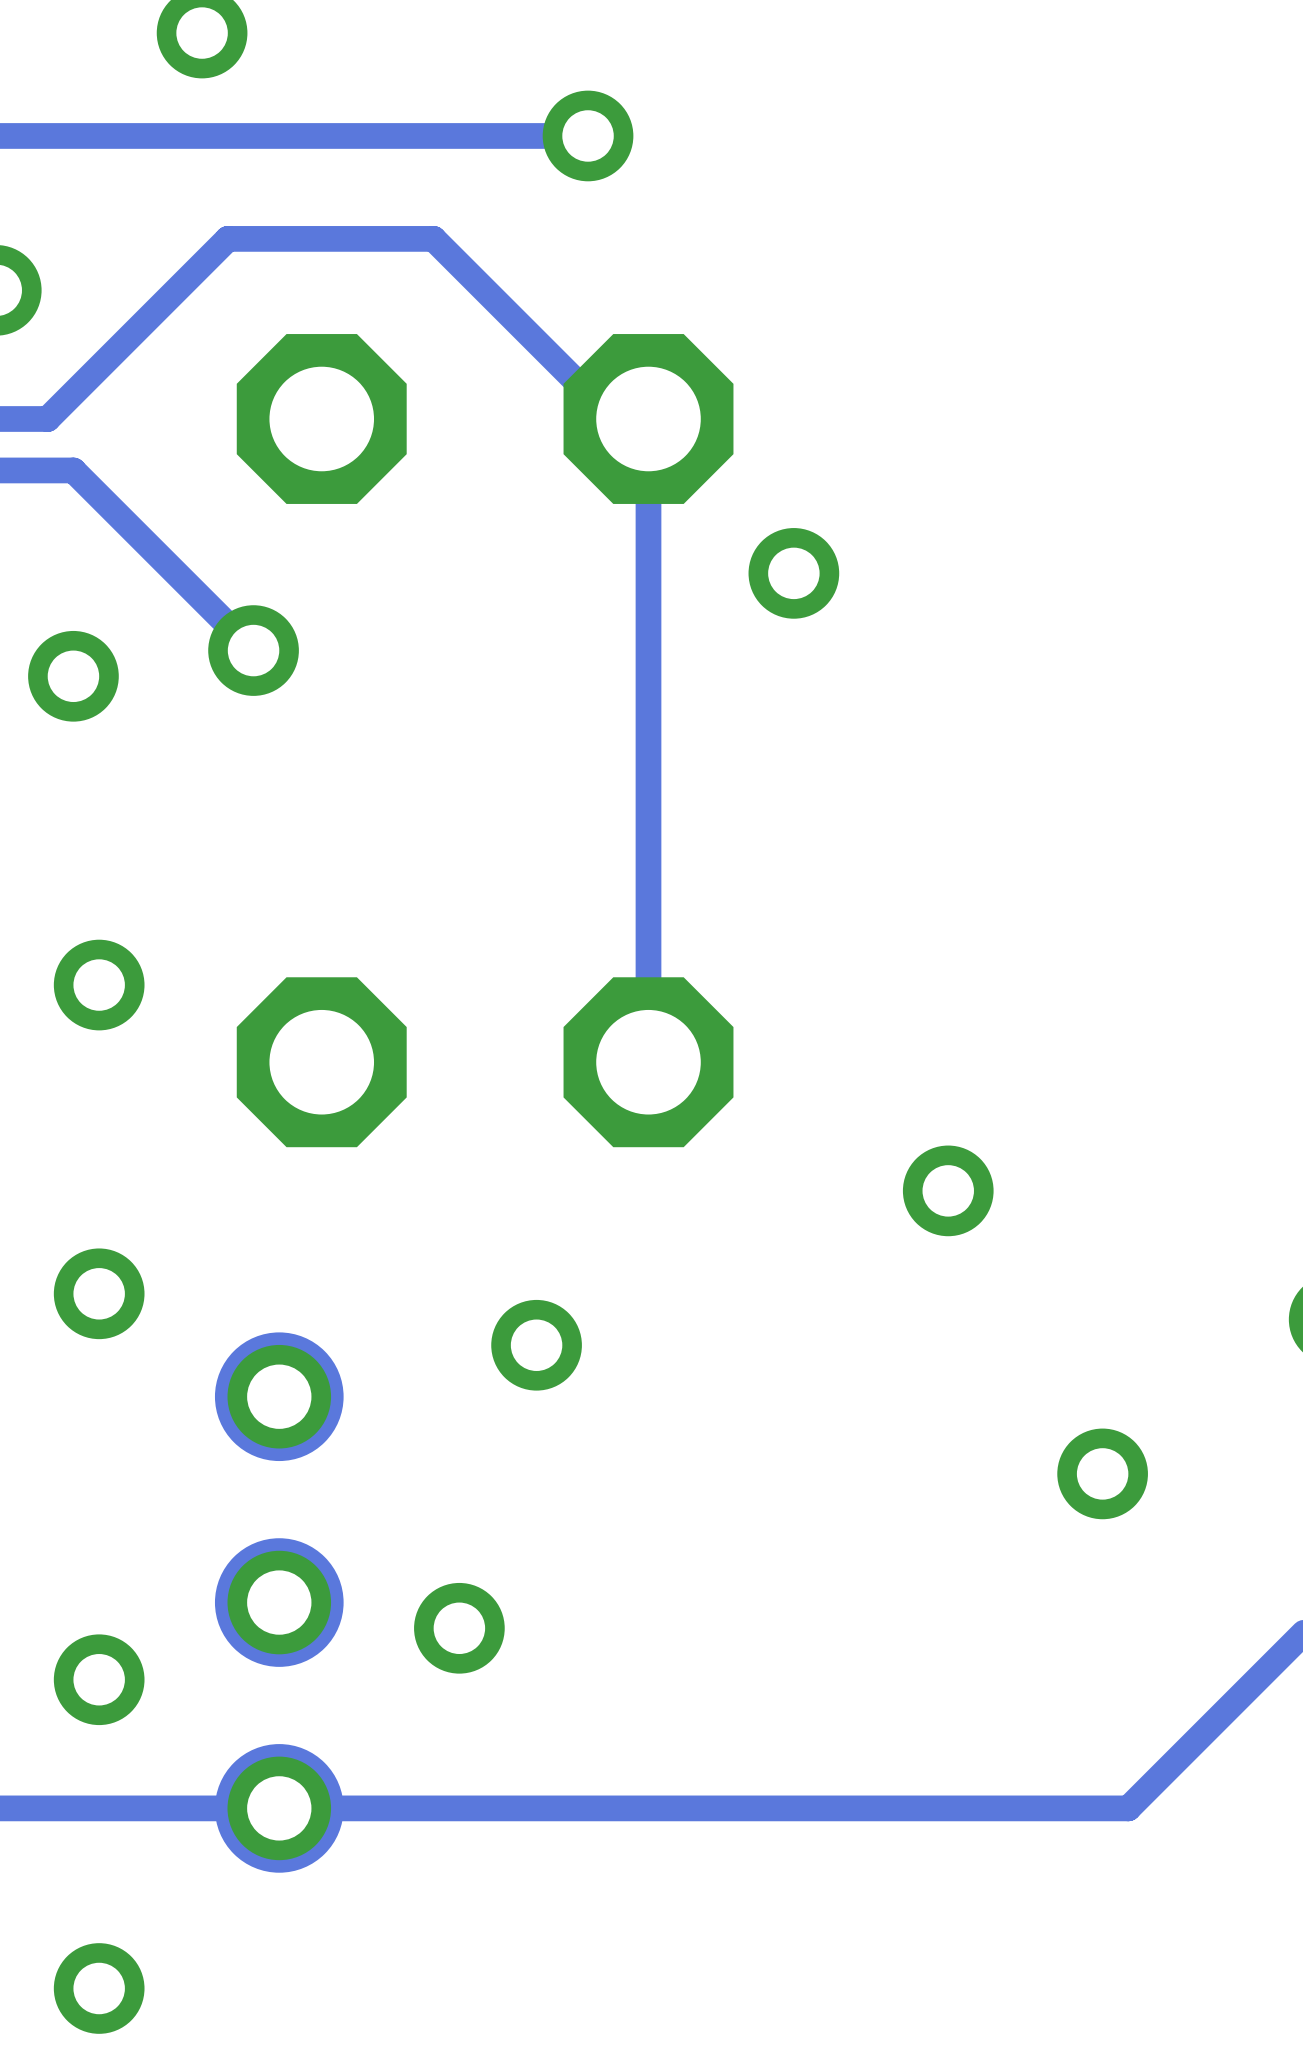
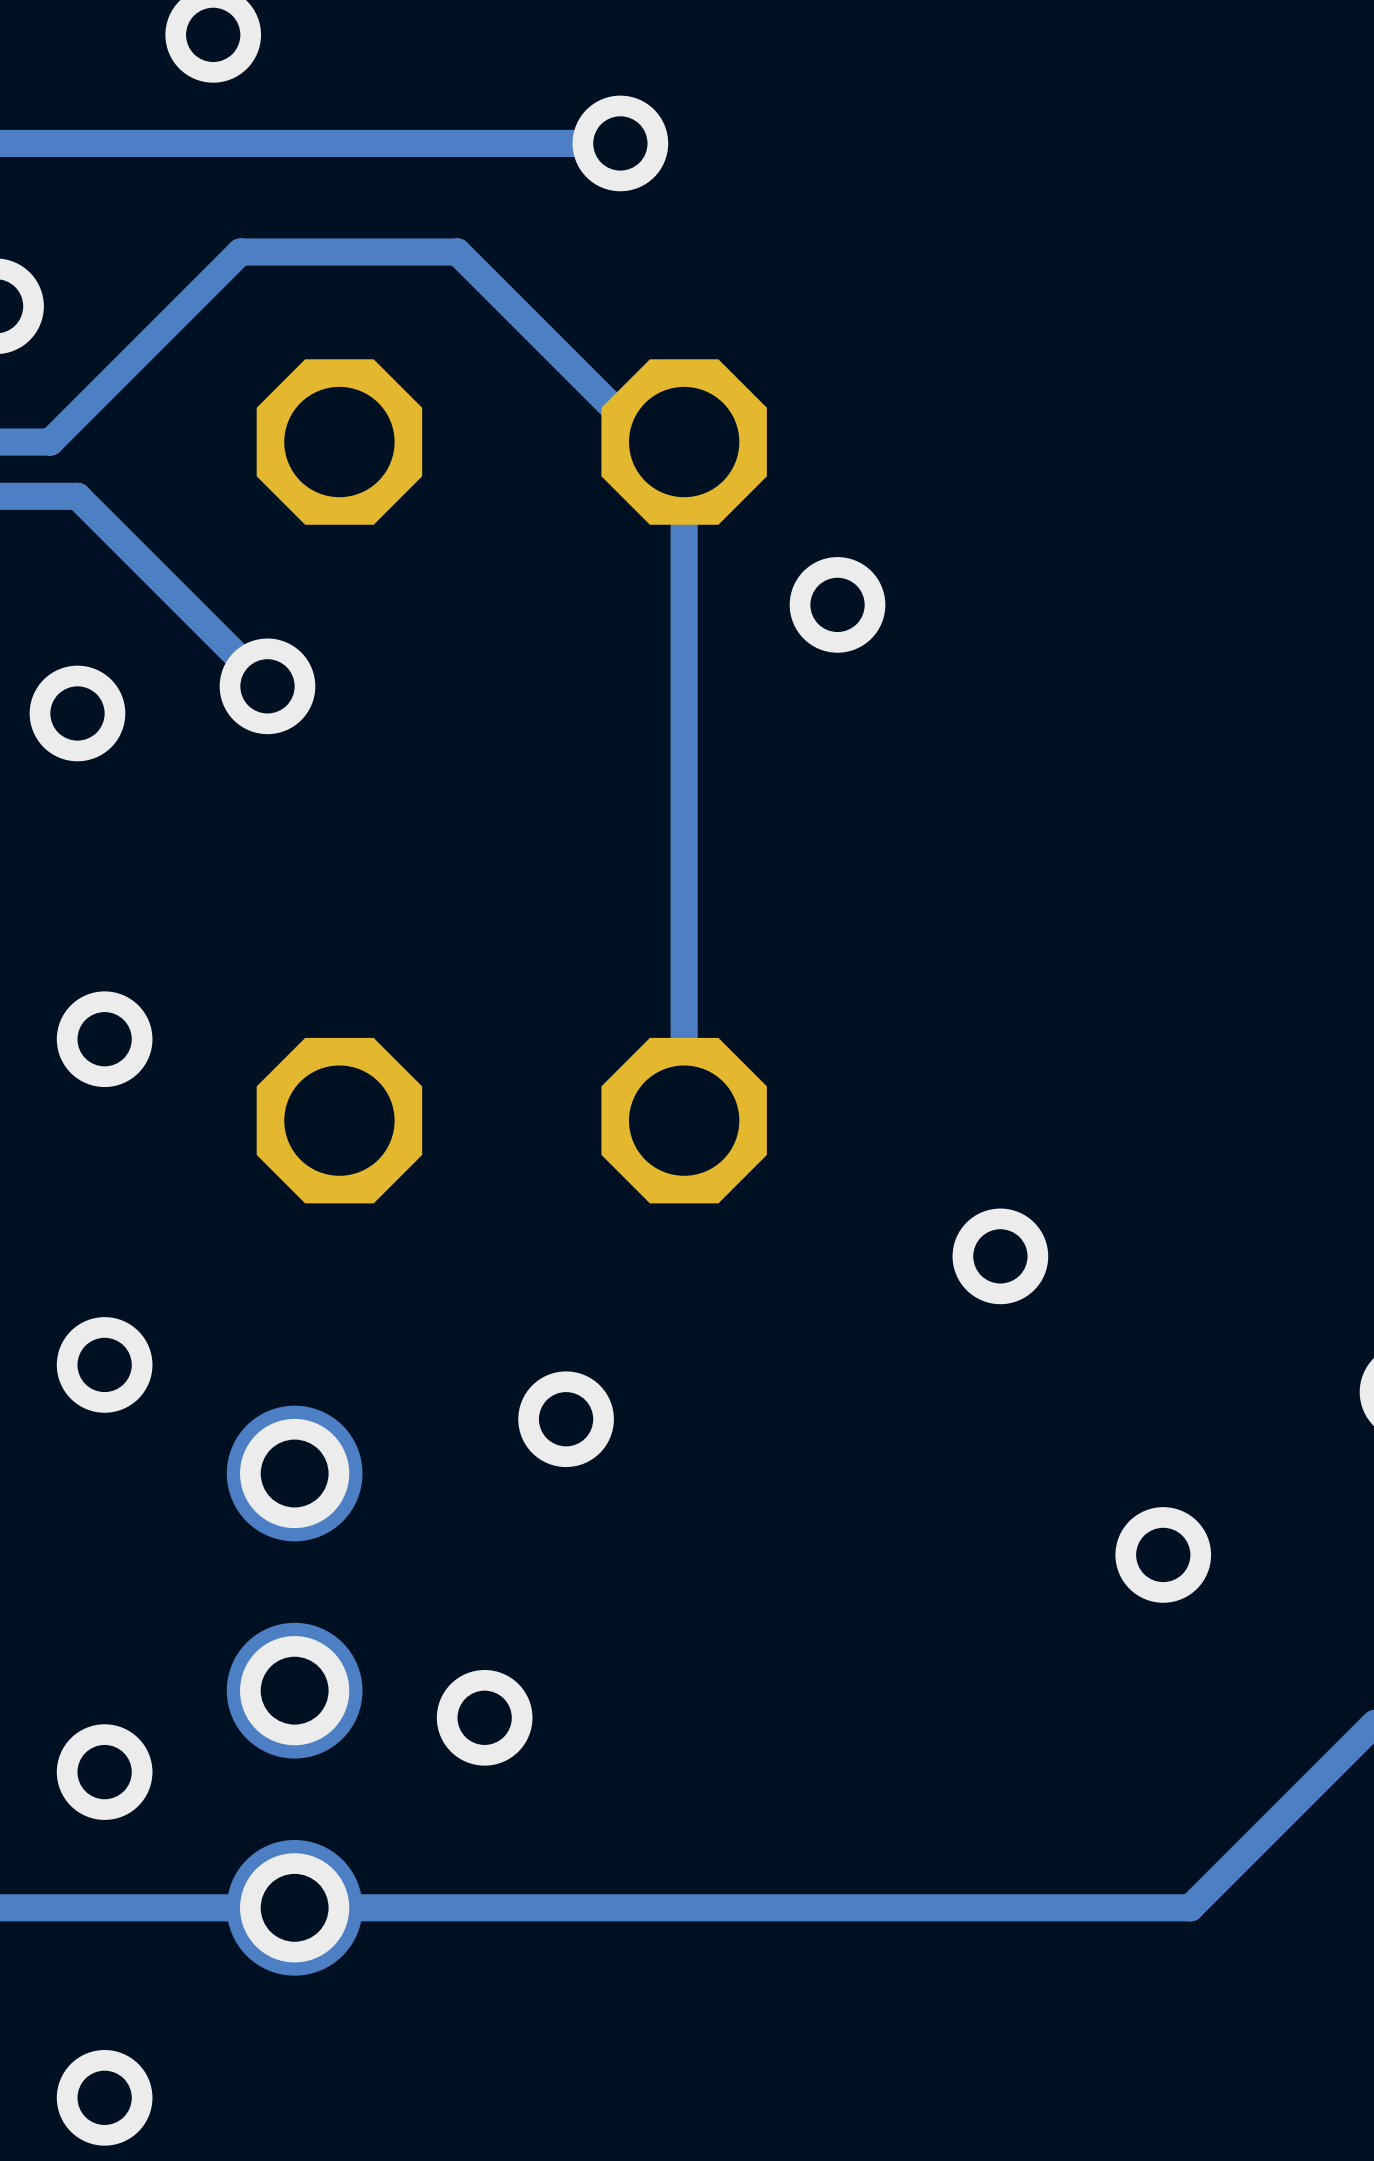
part footprint: [236, 334, 734, 504] -> [256, 359, 767, 525]
part footprint: [236, 977, 734, 1148] -> [256, 1037, 767, 1204]

